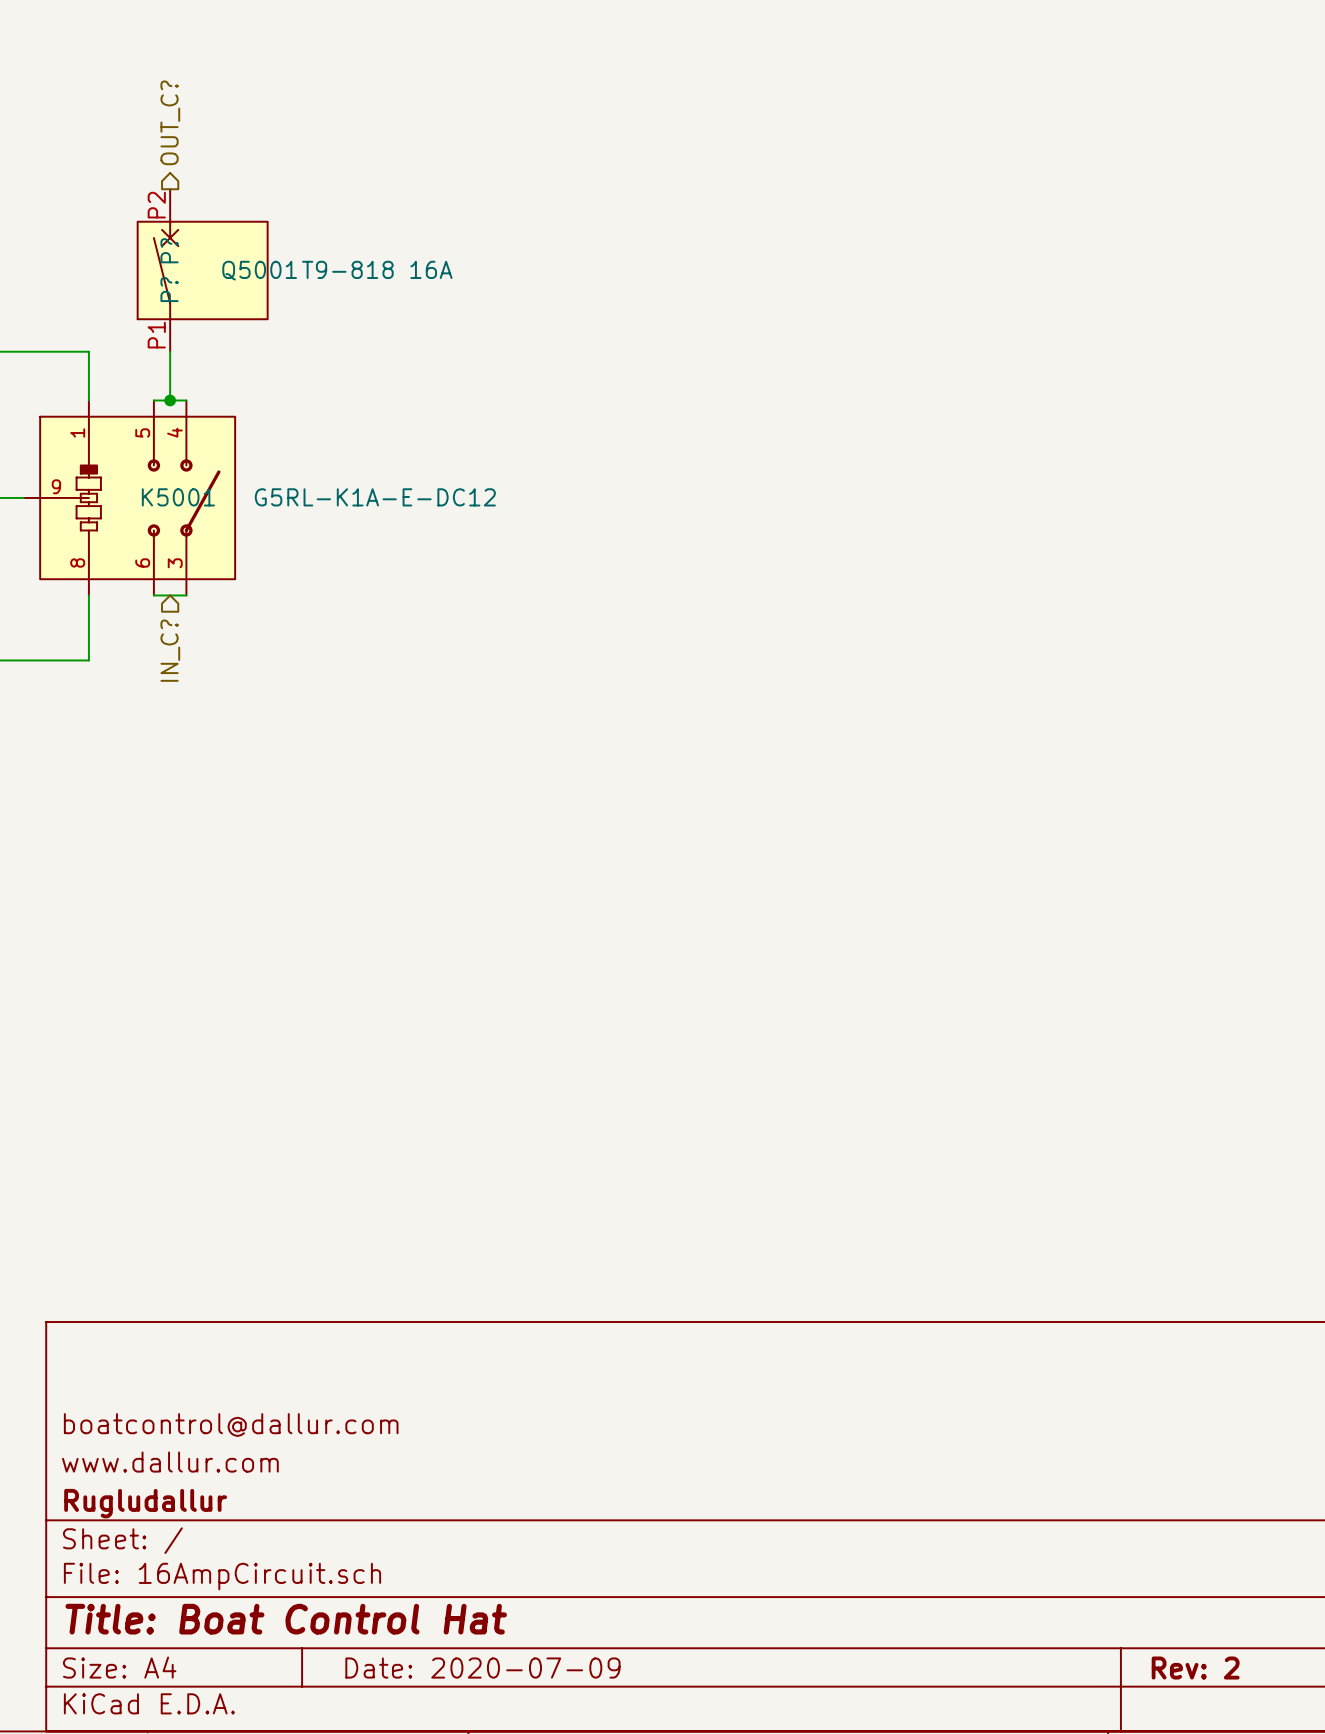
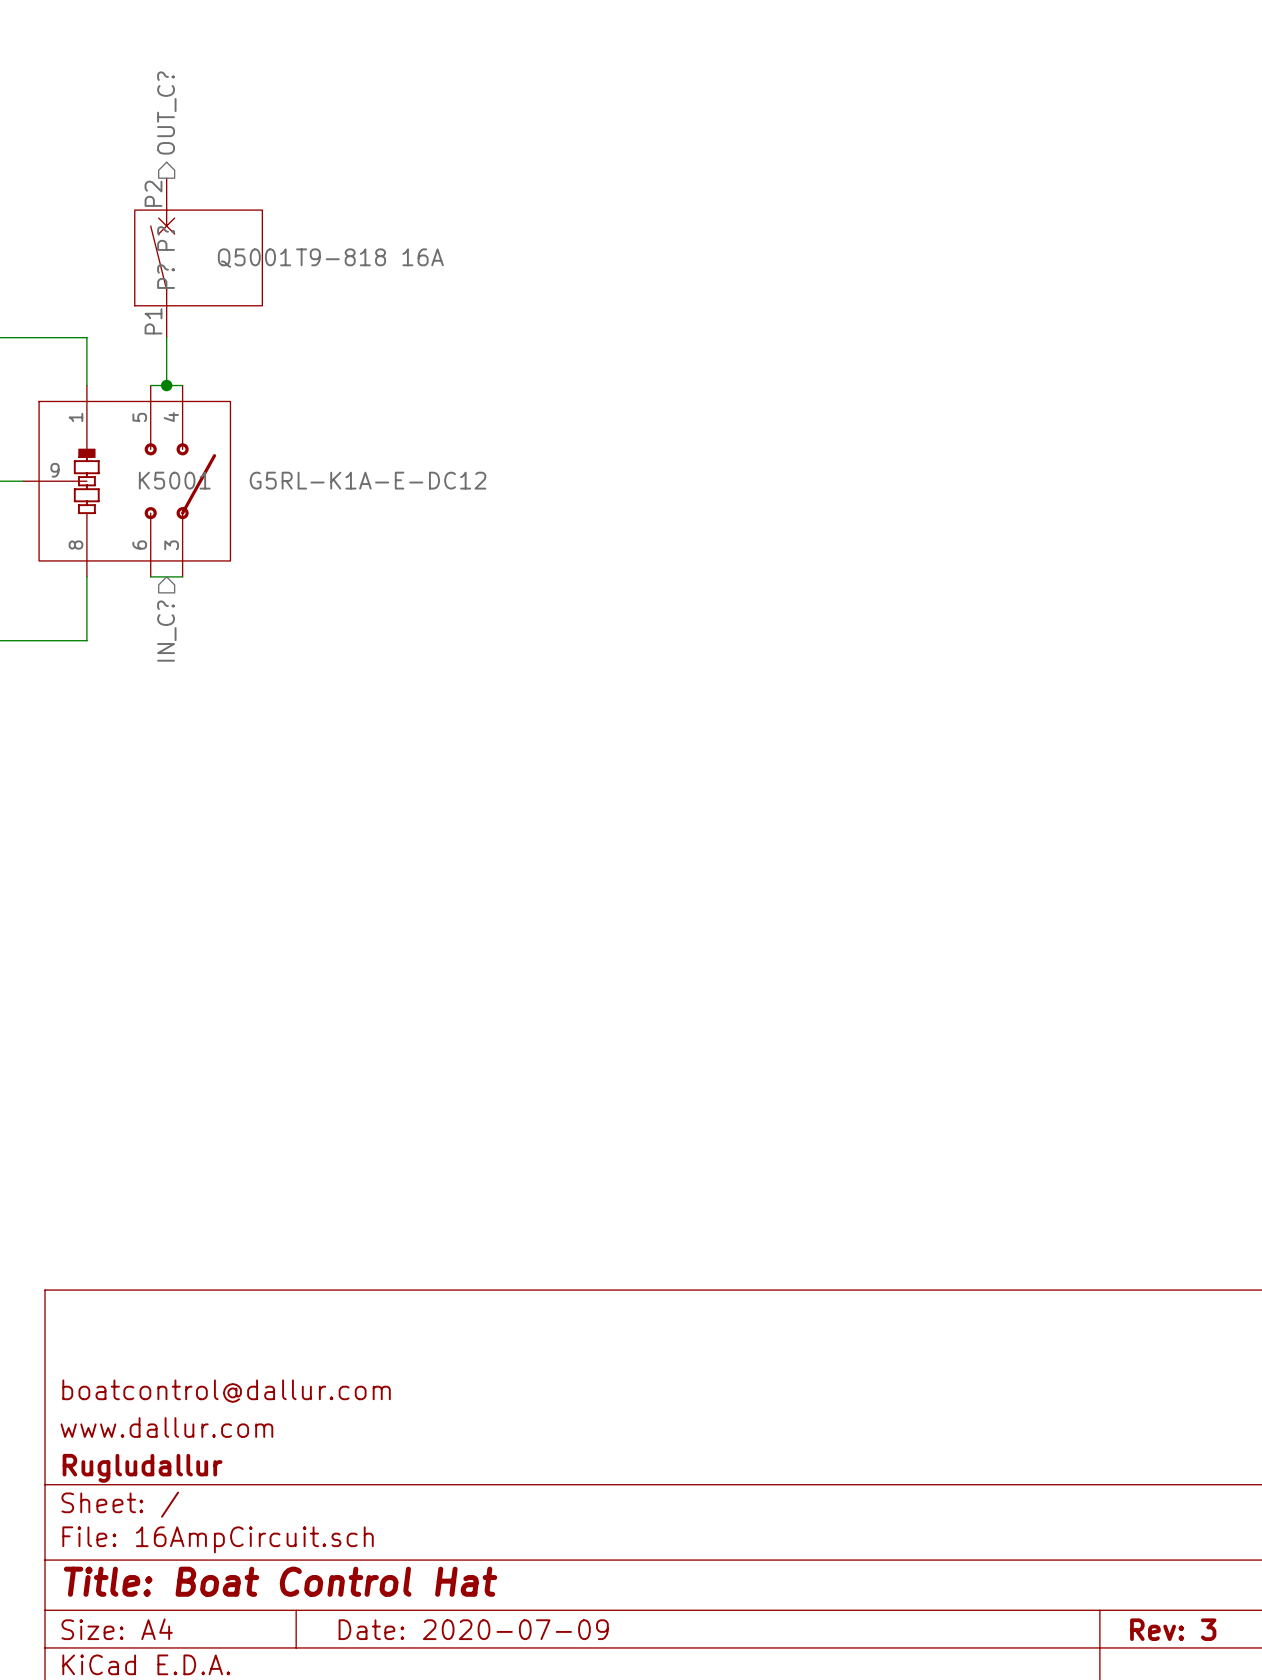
title block: Rev: 2 (1195, 1668) -> Rev: 3 (1173, 1629)

